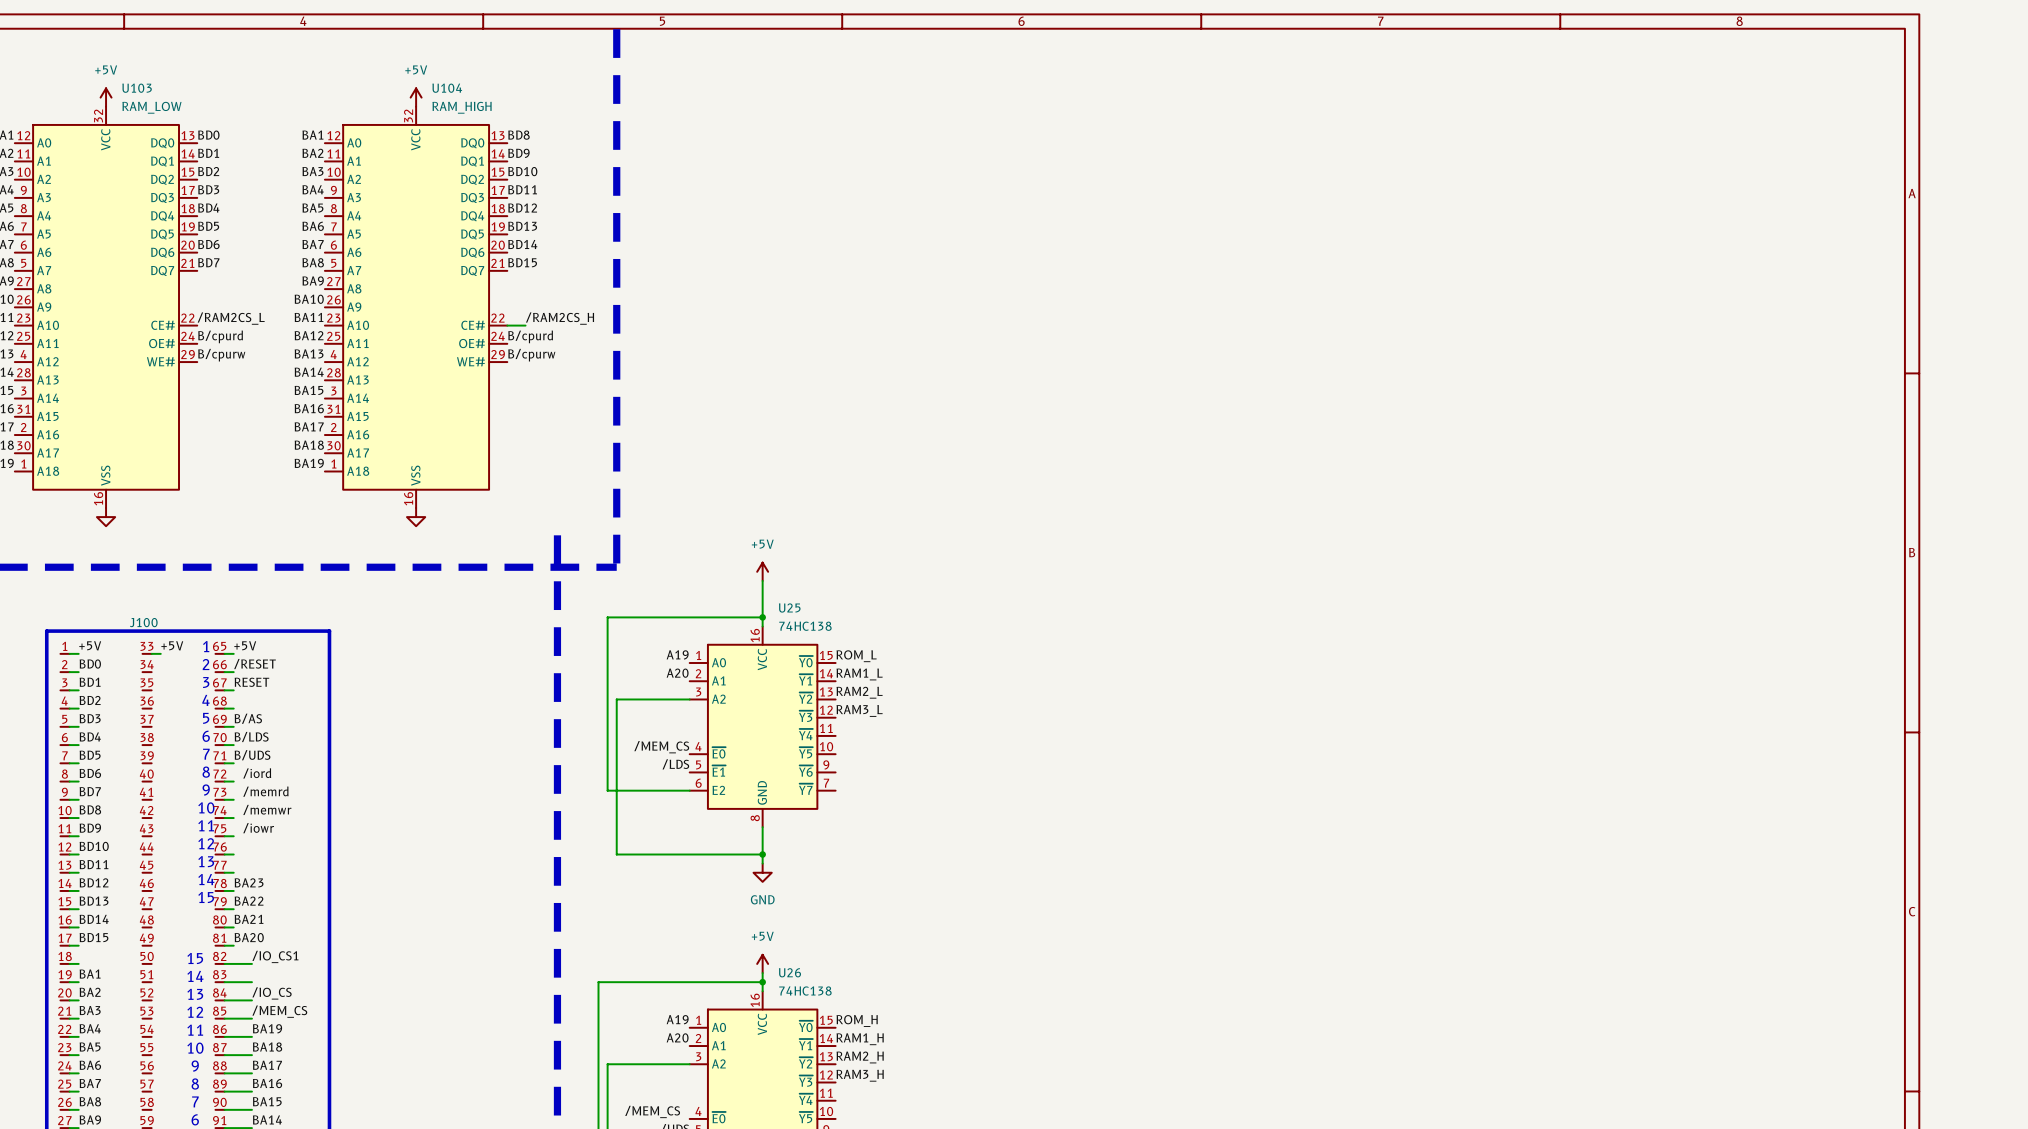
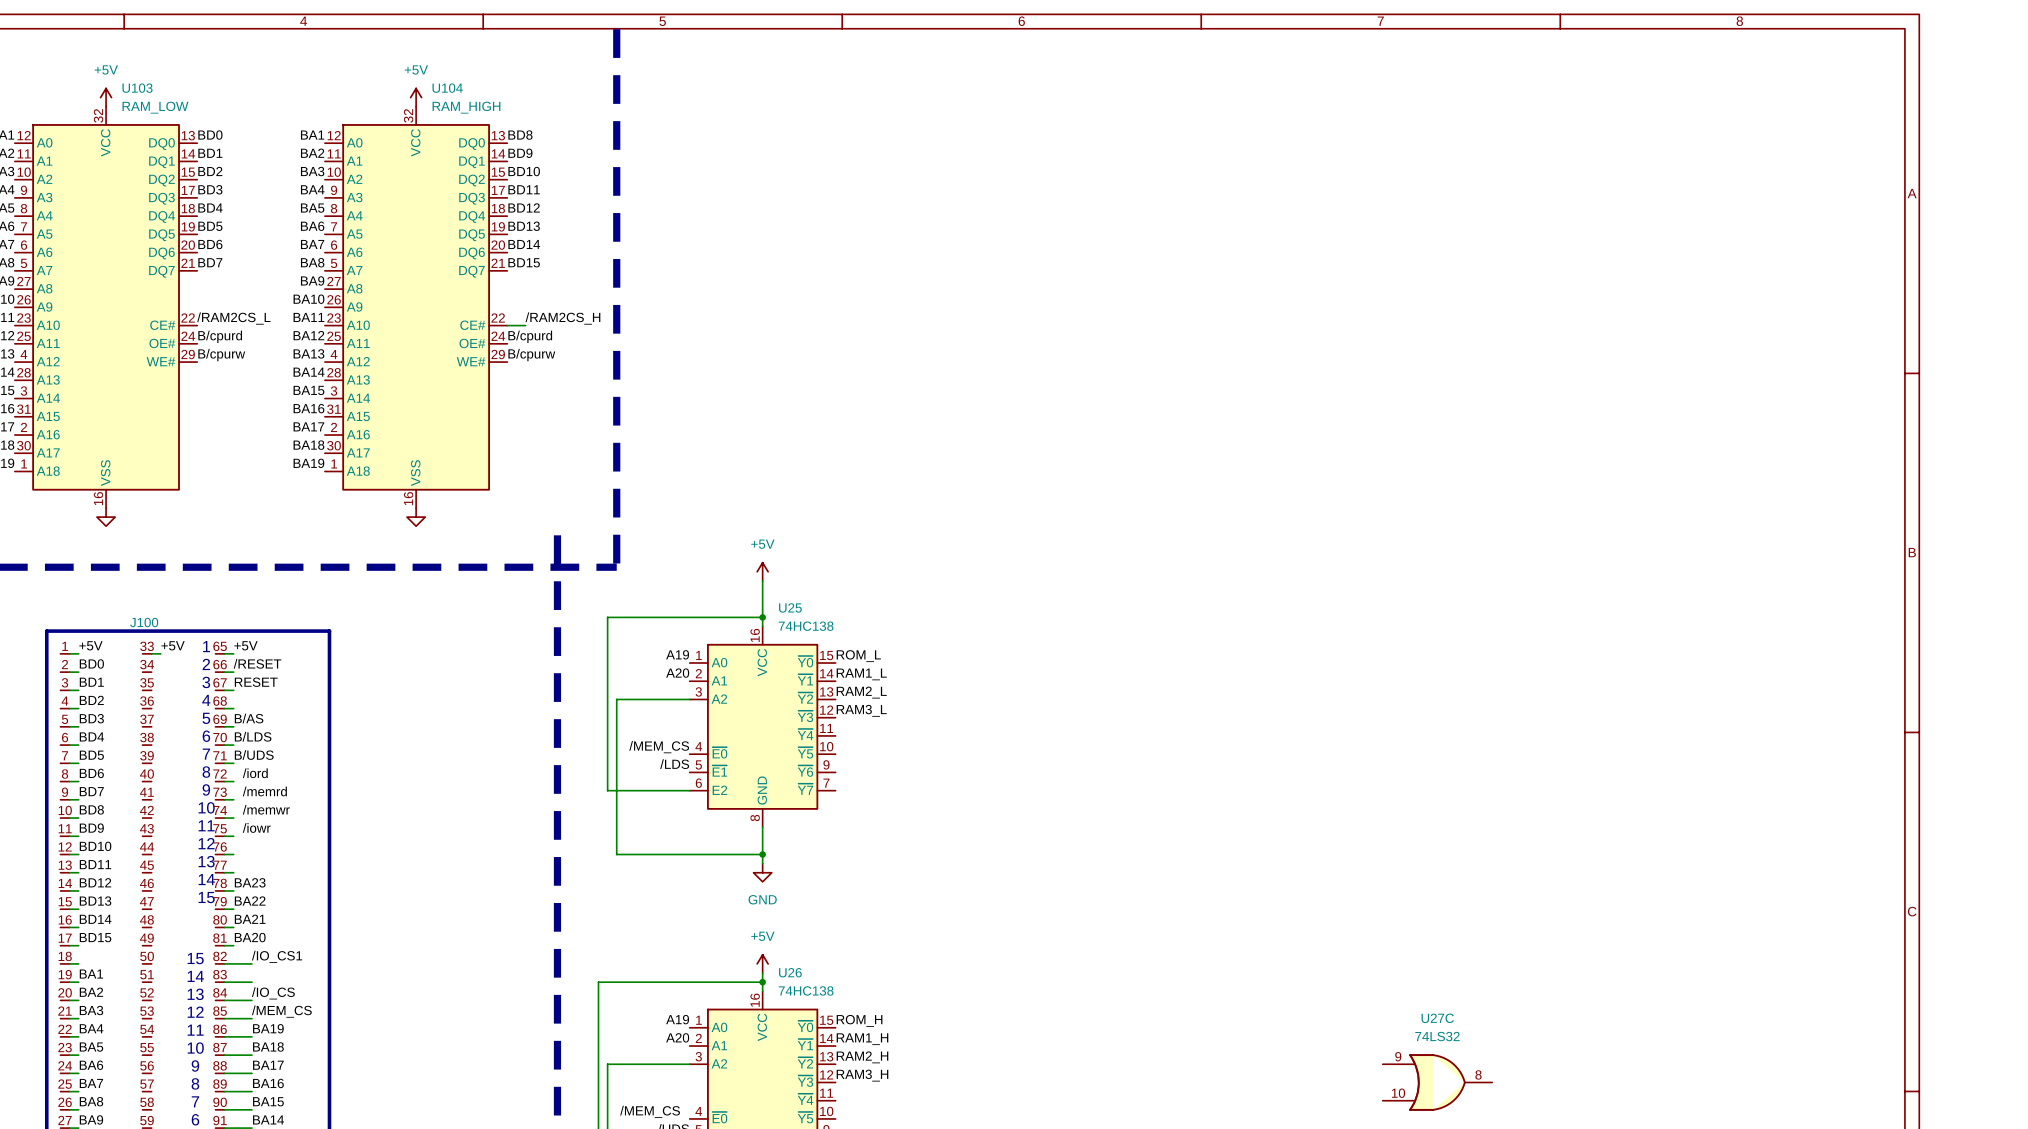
U27C: none -> 74LS32 (1437, 1082)

